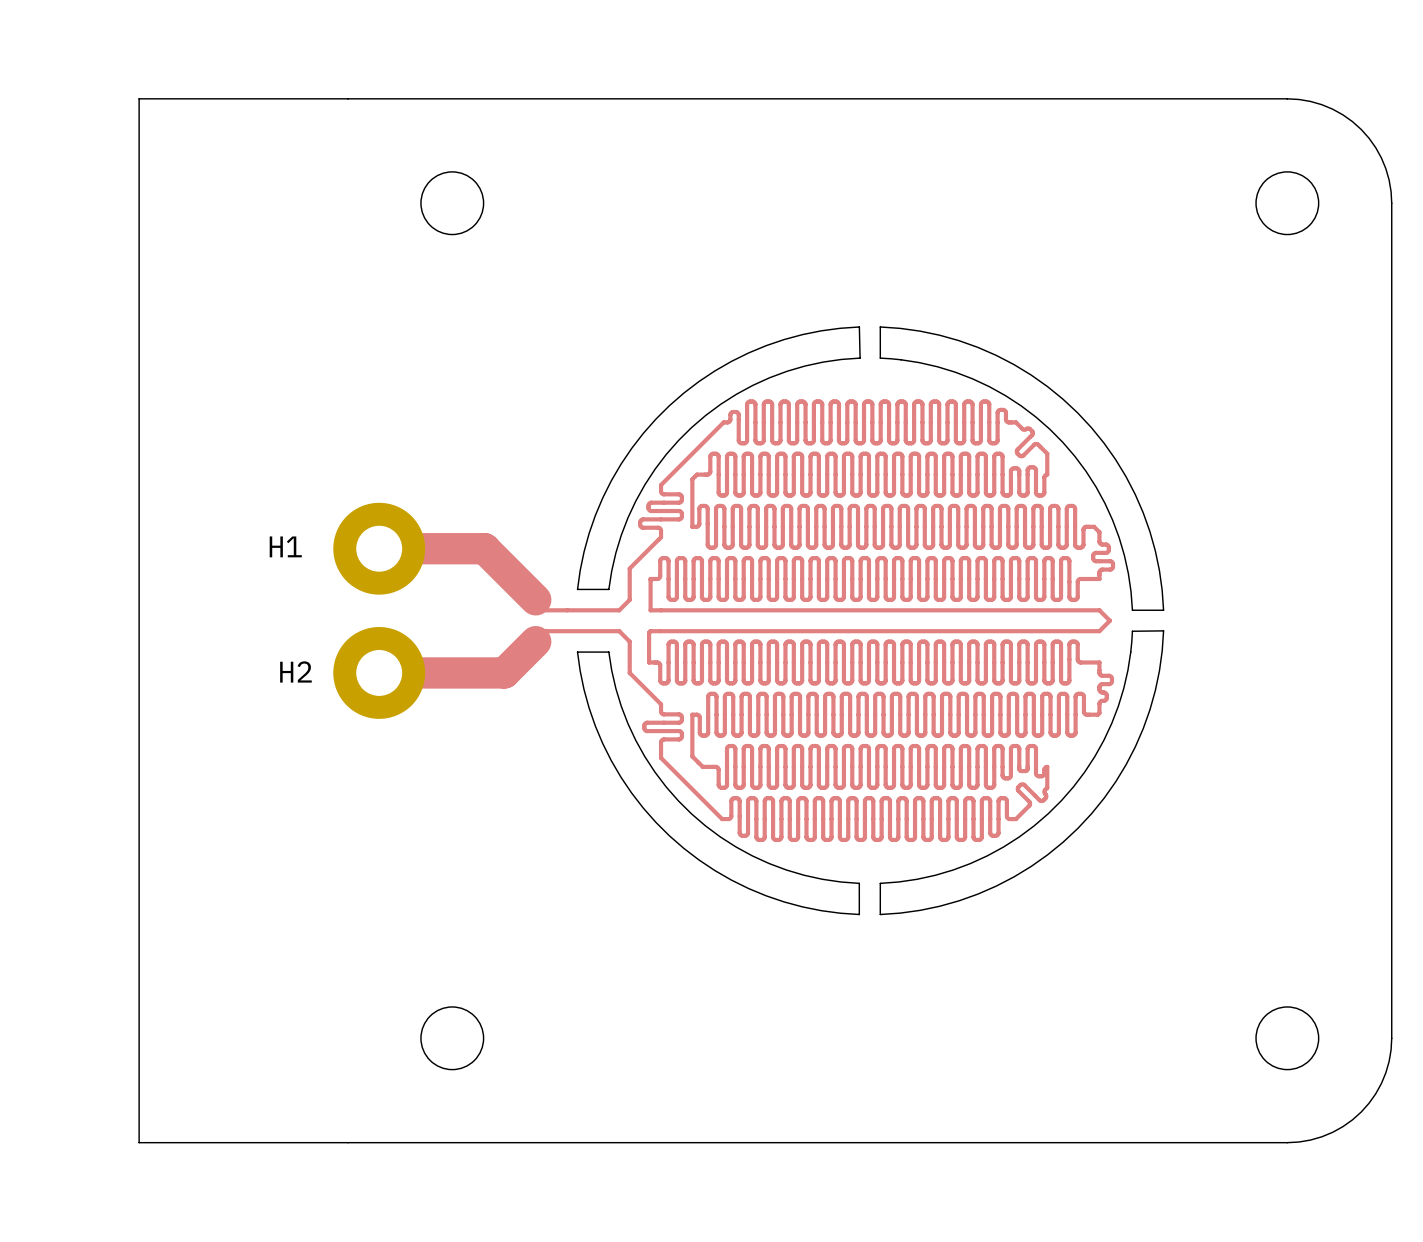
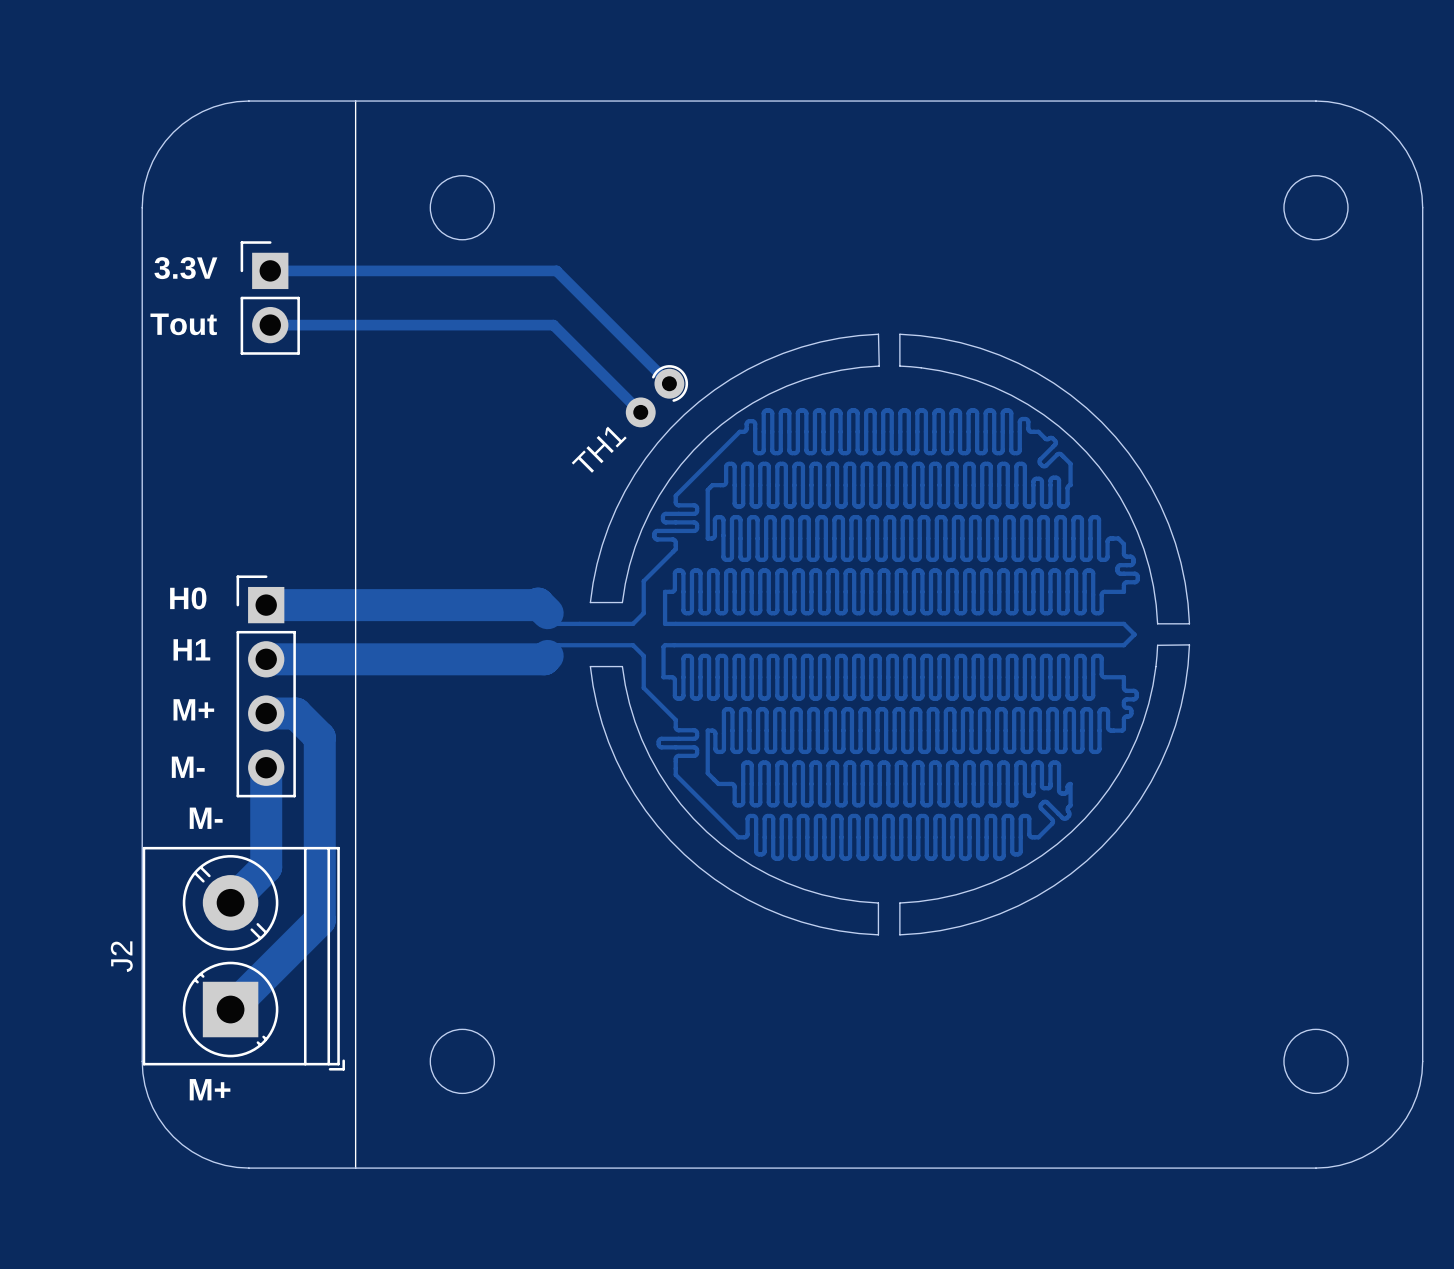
board edge: (243, 98) (139, 98) (139, 203) -> (248, 101) (225, 103) (202, 111) (173, 132) (158, 150) (148, 172) (142, 207)
line: none -> (355, 101) (355, 1168)
text: none -> 3.3V (185, 268)
track: none -> (270, 270) (556, 270) (669, 383)
part: none -> (270, 298)
text: none -> Tout (183, 324)
track: none -> (270, 325) (553, 325) (640, 412)
TH1: none -> (656, 396)
track: (379, 548) (484, 548) (526, 590) -> (266, 605) (538, 603)
H1: (379, 548) -> none
text: none -> H0 (188, 598)
text: none -> H1 (191, 649)
track: (532, 644) (504, 672) (379, 672) -> (544, 659) (266, 659)
part: none -> (266, 686)
H2: (379, 672) -> none
text: none -> M+ (193, 709)
track: none -> (266, 713) (295, 713) (319, 737) (319, 920) (230, 1009)
text: none -> M- (188, 767)
track: none -> (266, 767) (266, 867) (230, 902)
text: none -> M- (206, 818)
J2: none -> (243, 958)
board edge: (139, 1038) (139, 1142) (243, 1142) -> (142, 1061) (144, 1085) (152, 1107) (173, 1136) (192, 1151) (213, 1162) (248, 1168)
text: none -> M+ (210, 1089)

